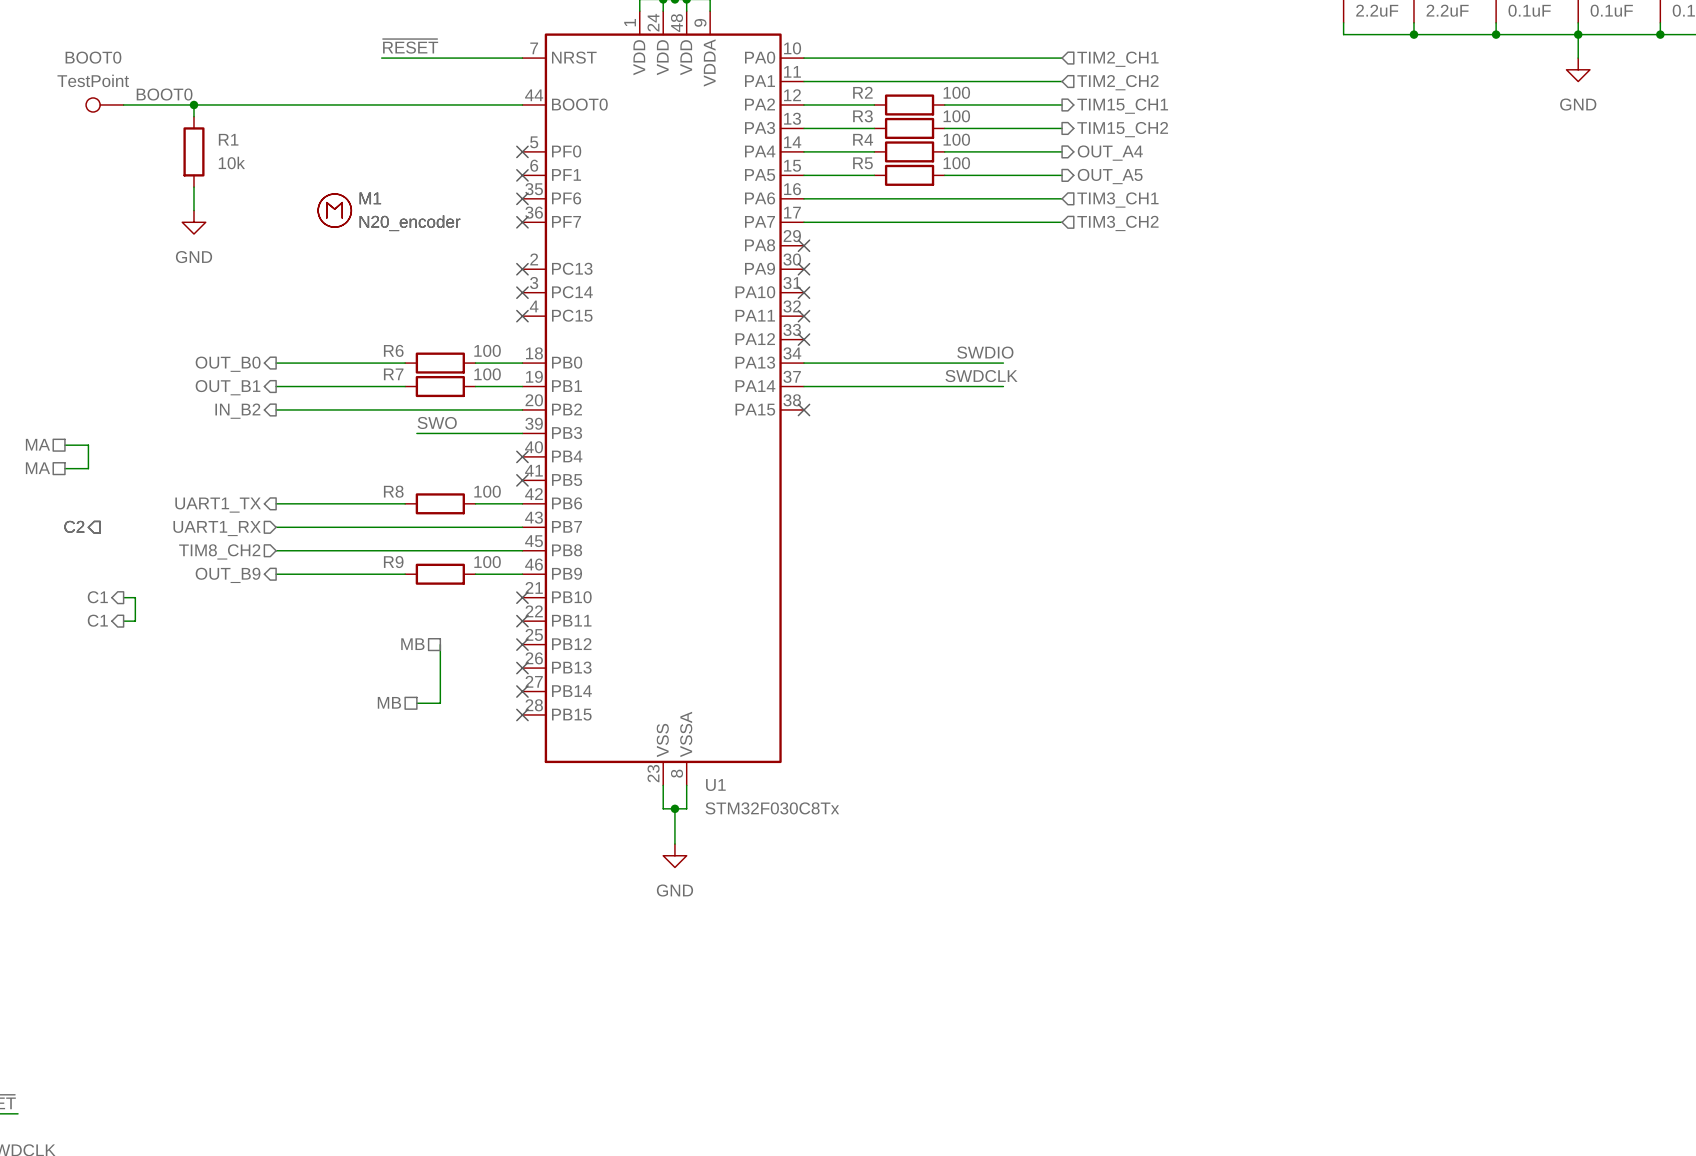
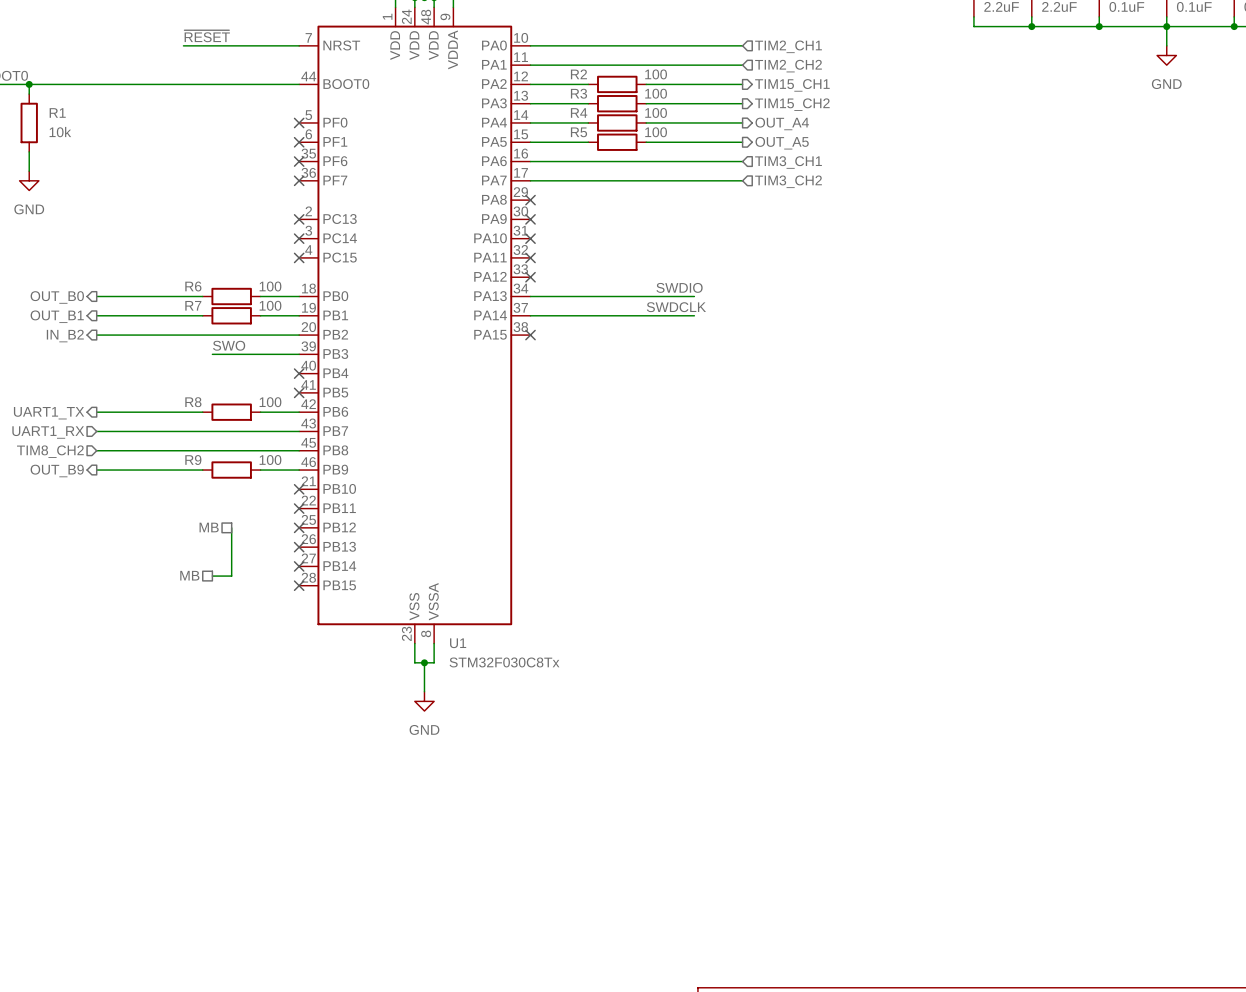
M1: N20_encoder (334, 210) -> none

